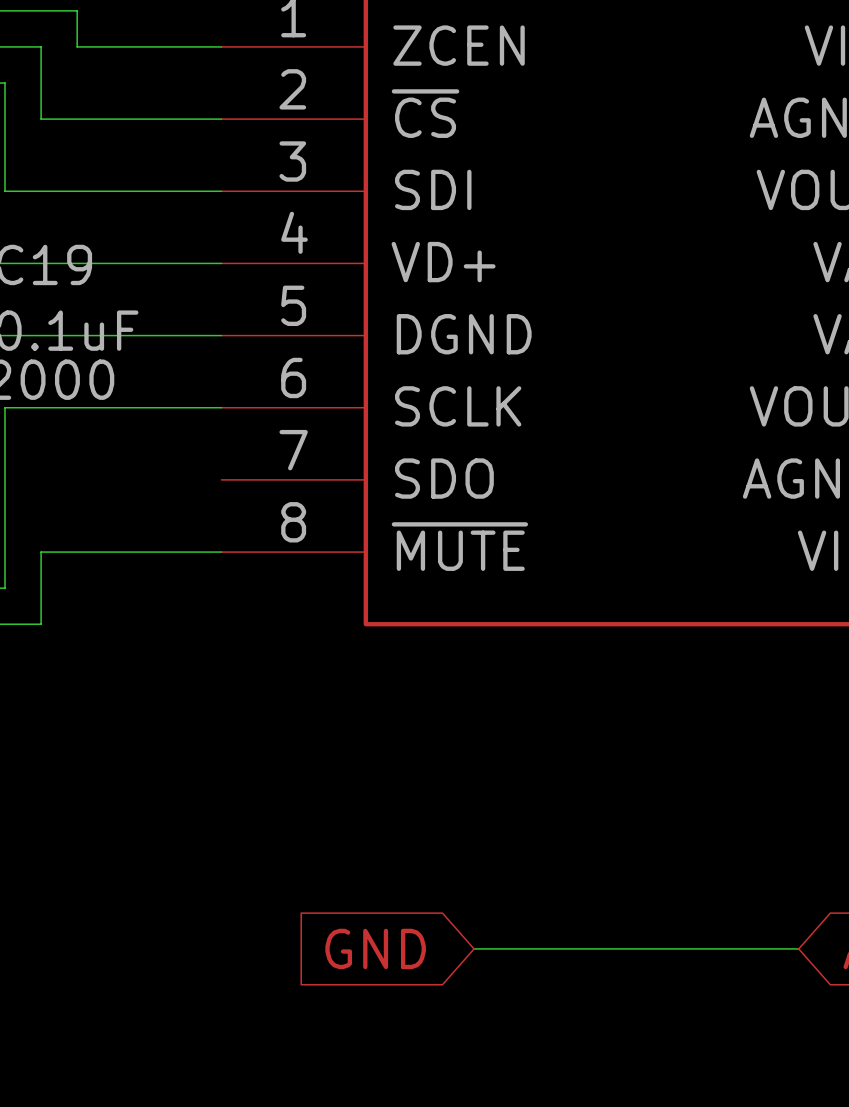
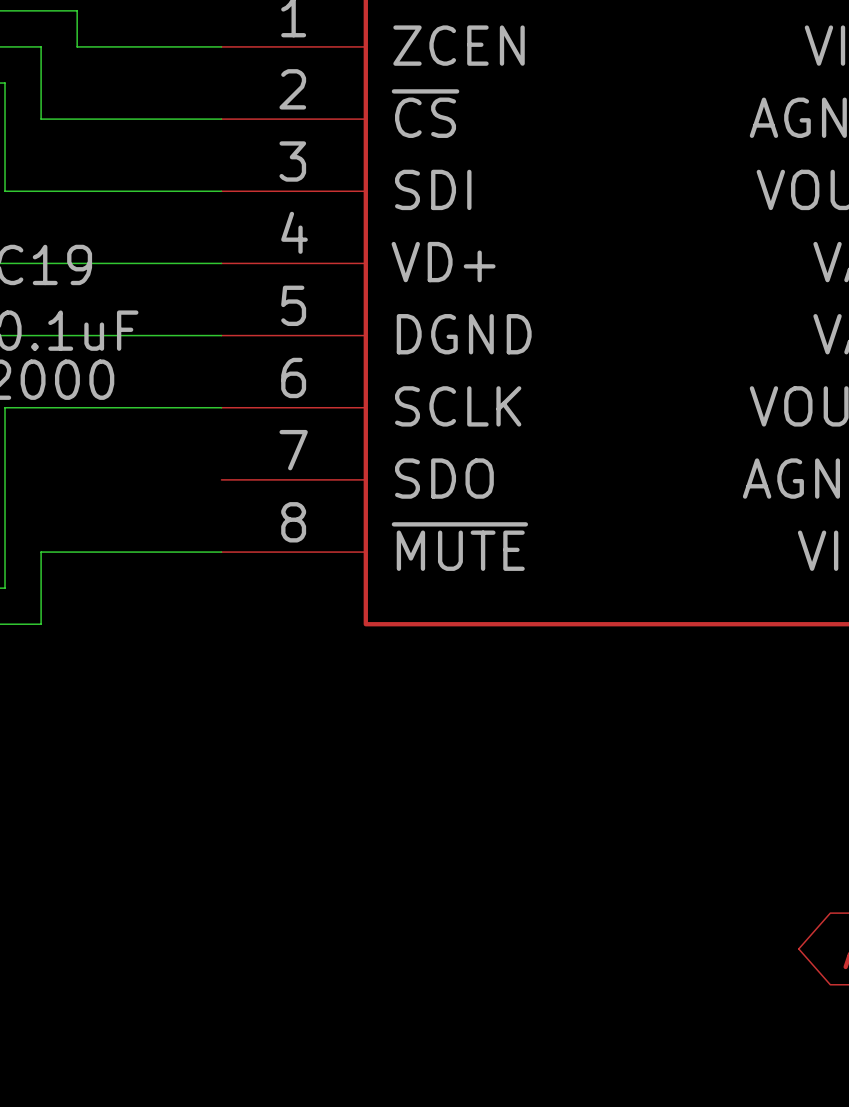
global label: GND (375, 948) -> none
wire: (474, 948) (798, 948) -> none

